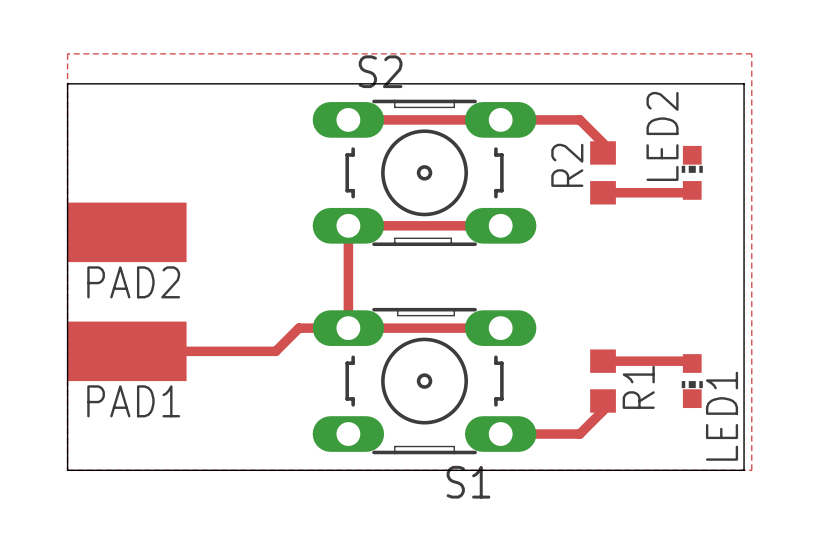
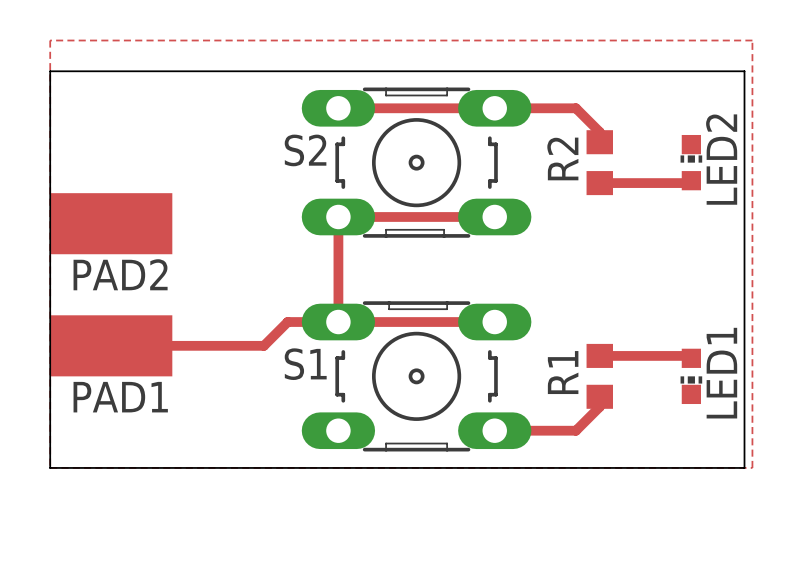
S2 name position: S2 (380, 71) -> S2 (305, 150)
LED2 name position: LED2 (662, 136) -> LED2 (721, 159)
R1 name position: R1 (638, 387) -> R1 (563, 372)
LED1 name position: LED1 (722, 416) -> LED1 (721, 373)
S1 name position: S1 (468, 482) -> S1 (305, 364)

